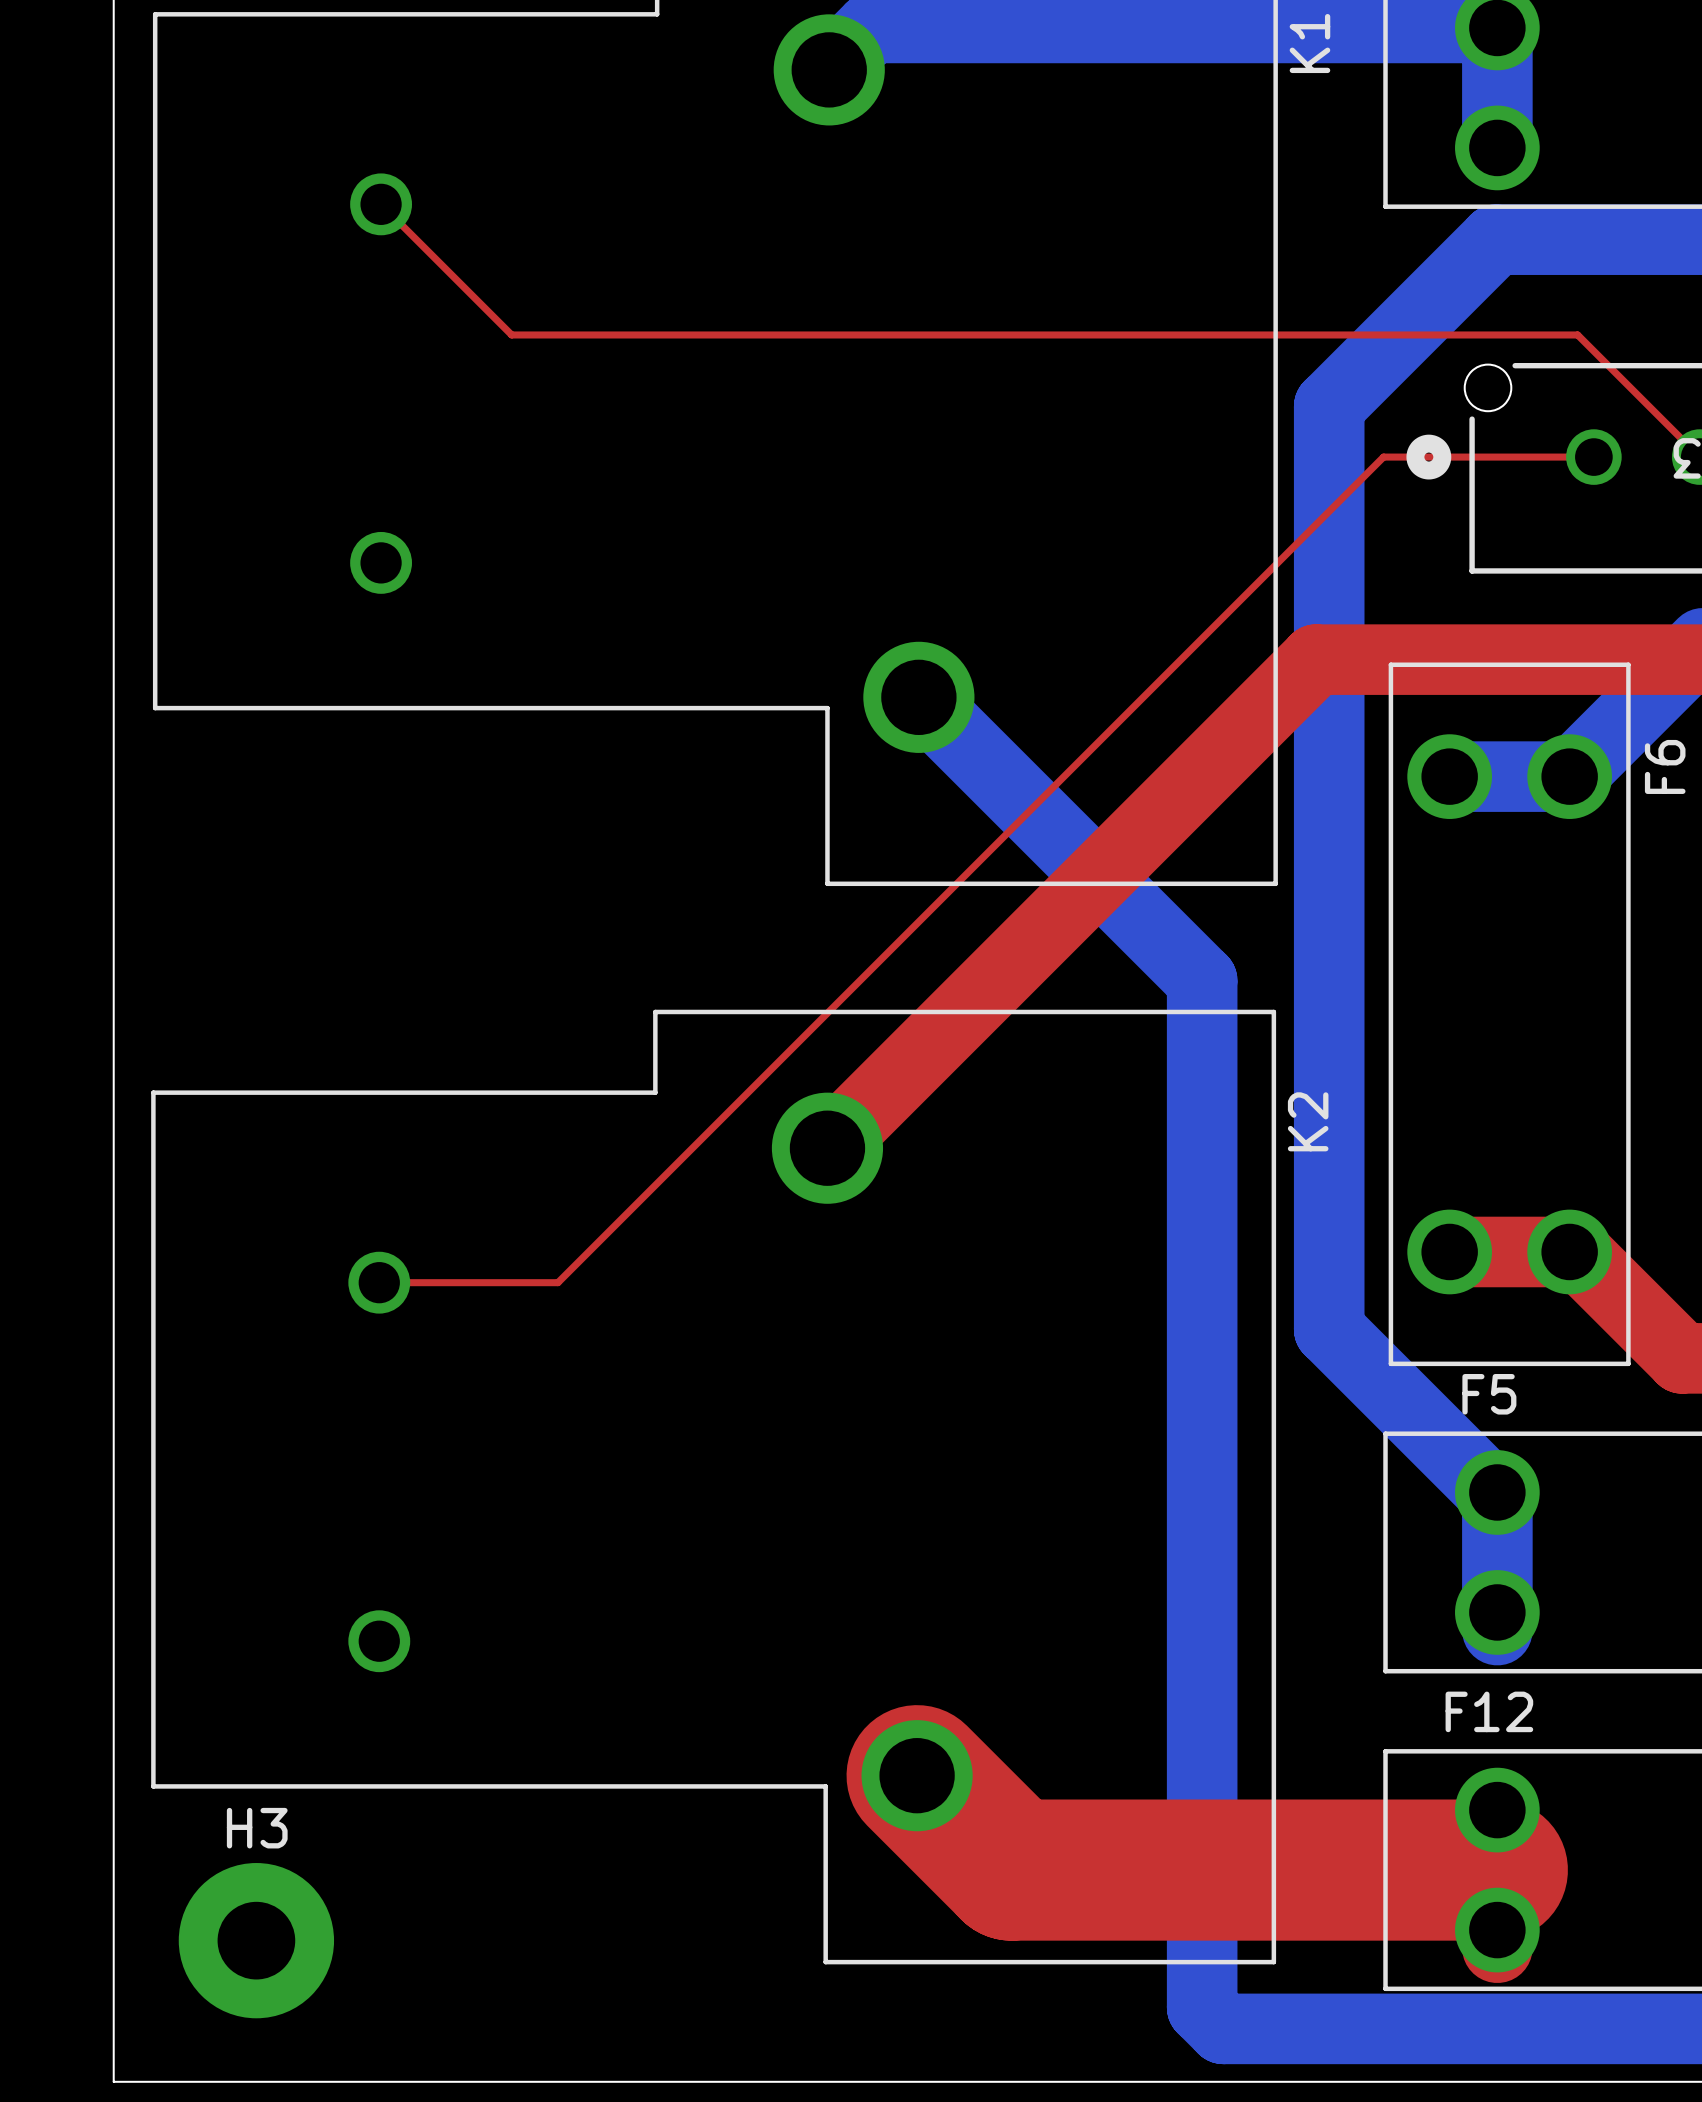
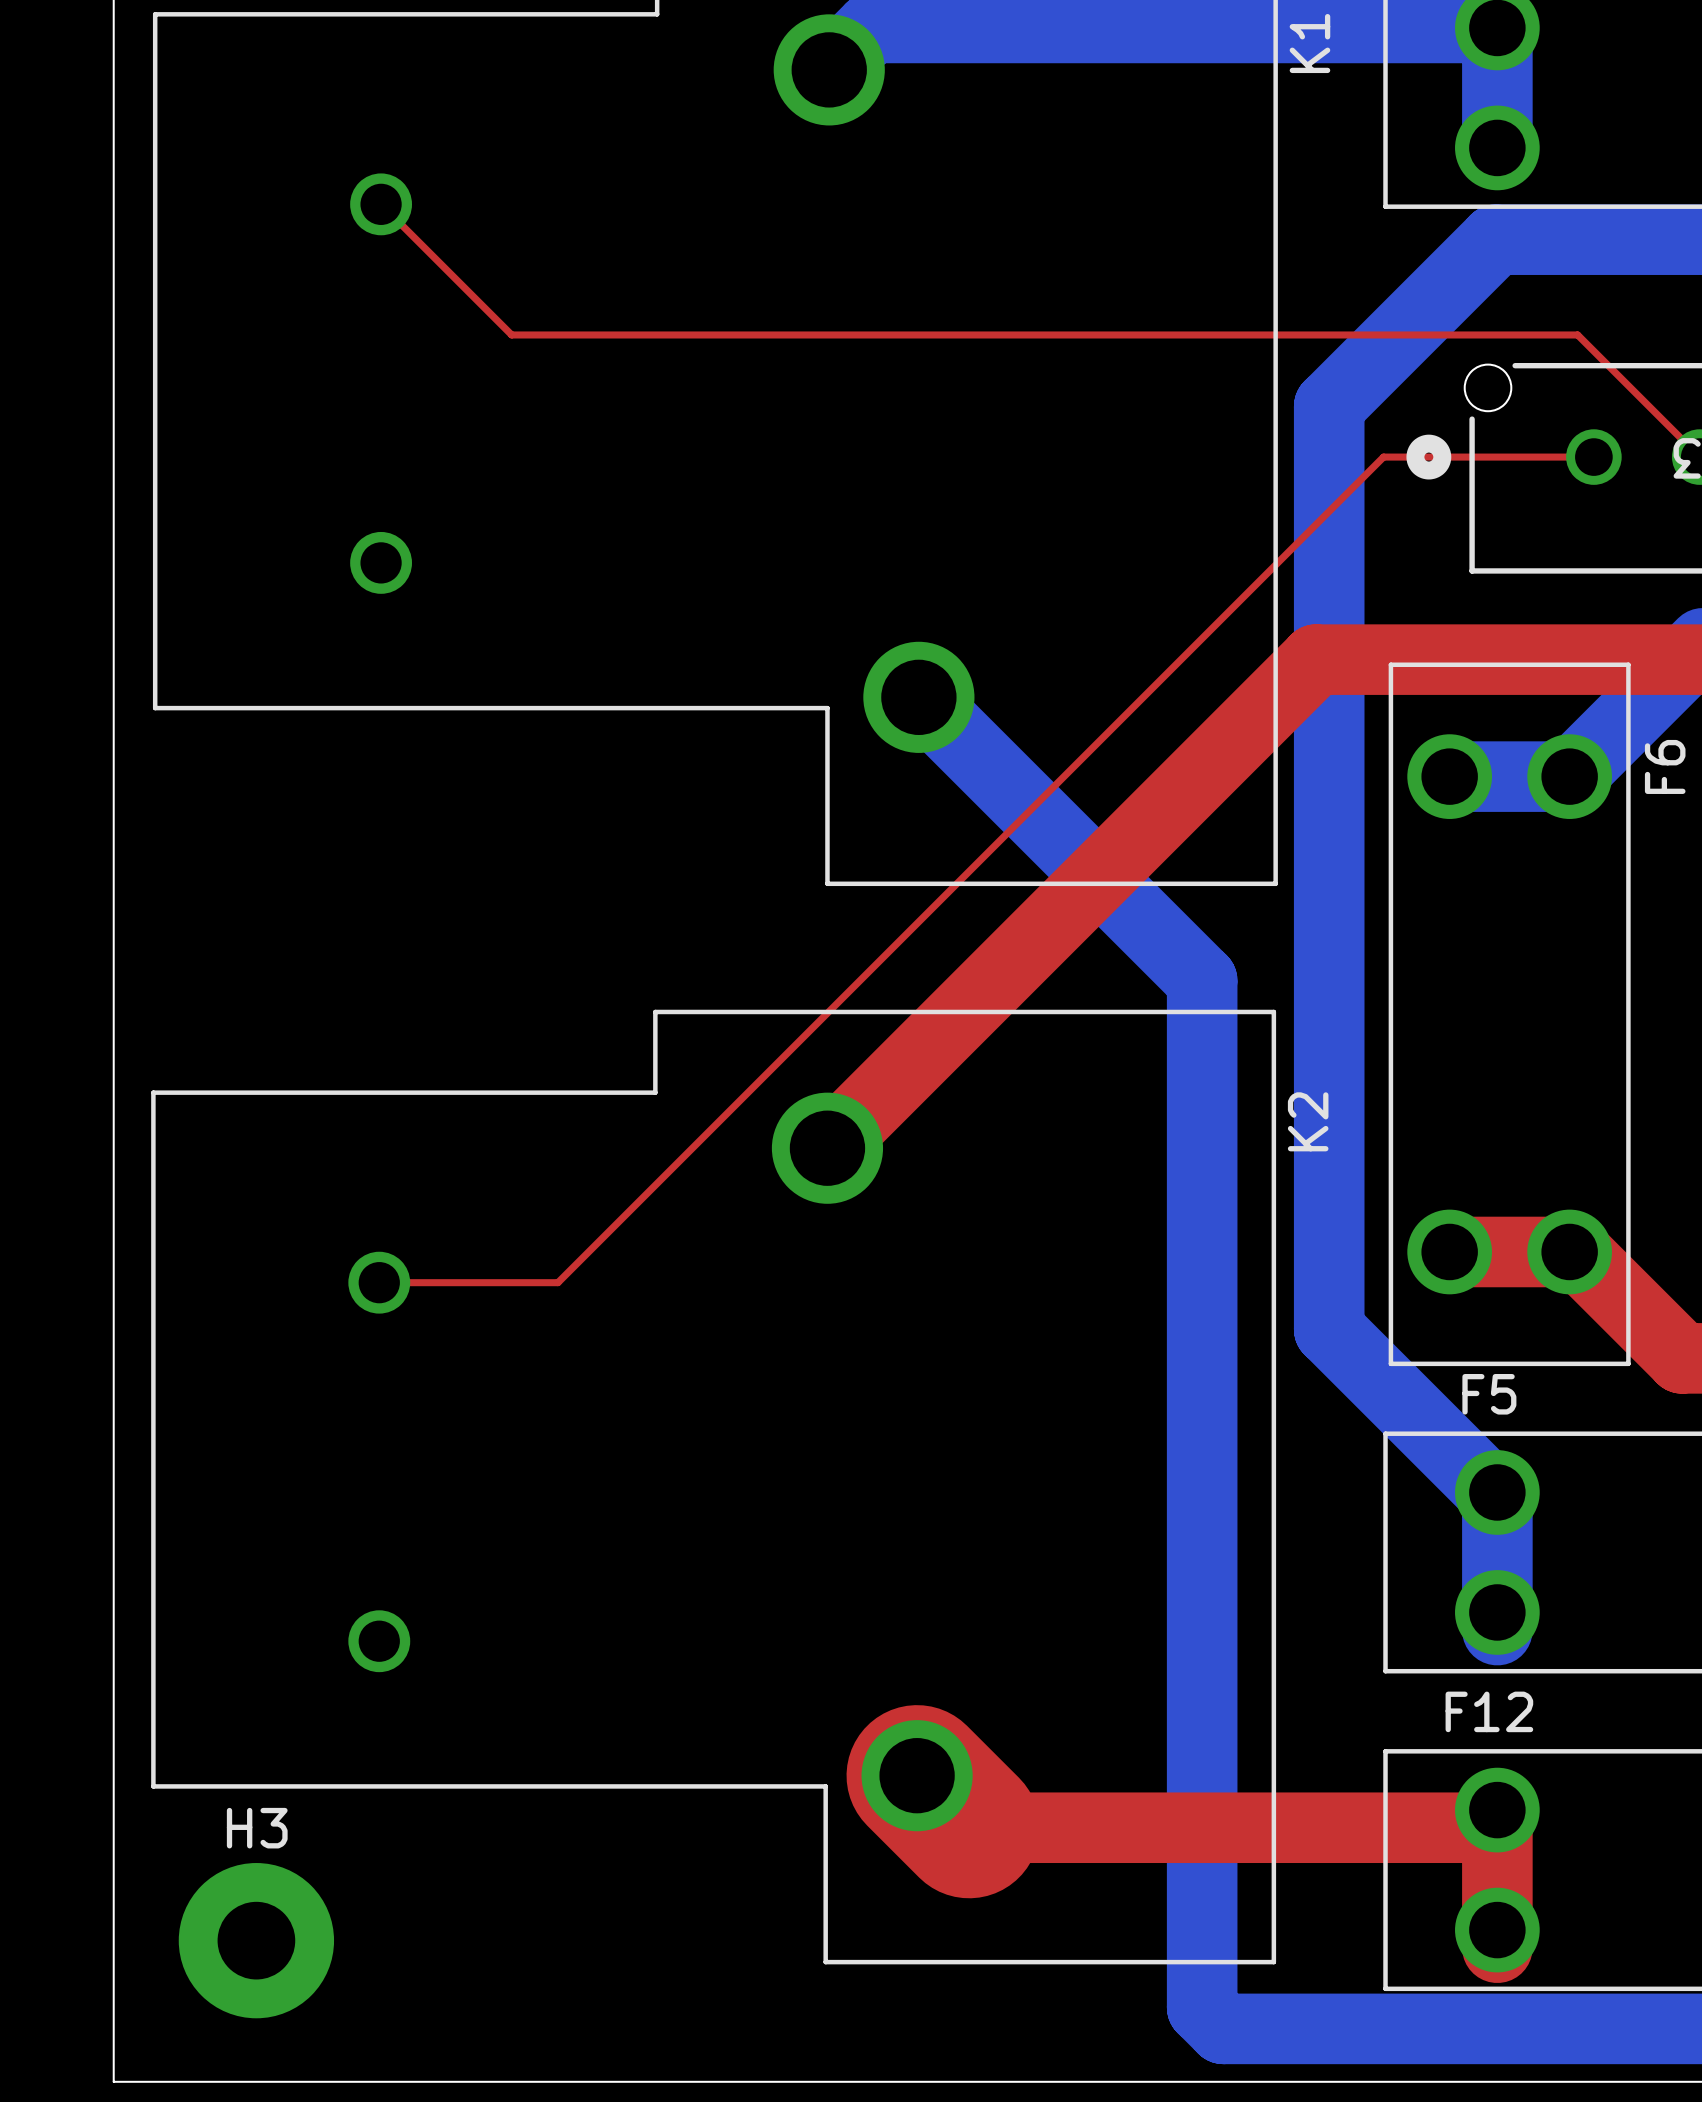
top track: (969, 1827) (1011, 1870) (1497, 1870) -> (969, 1827) (1497, 1827)

